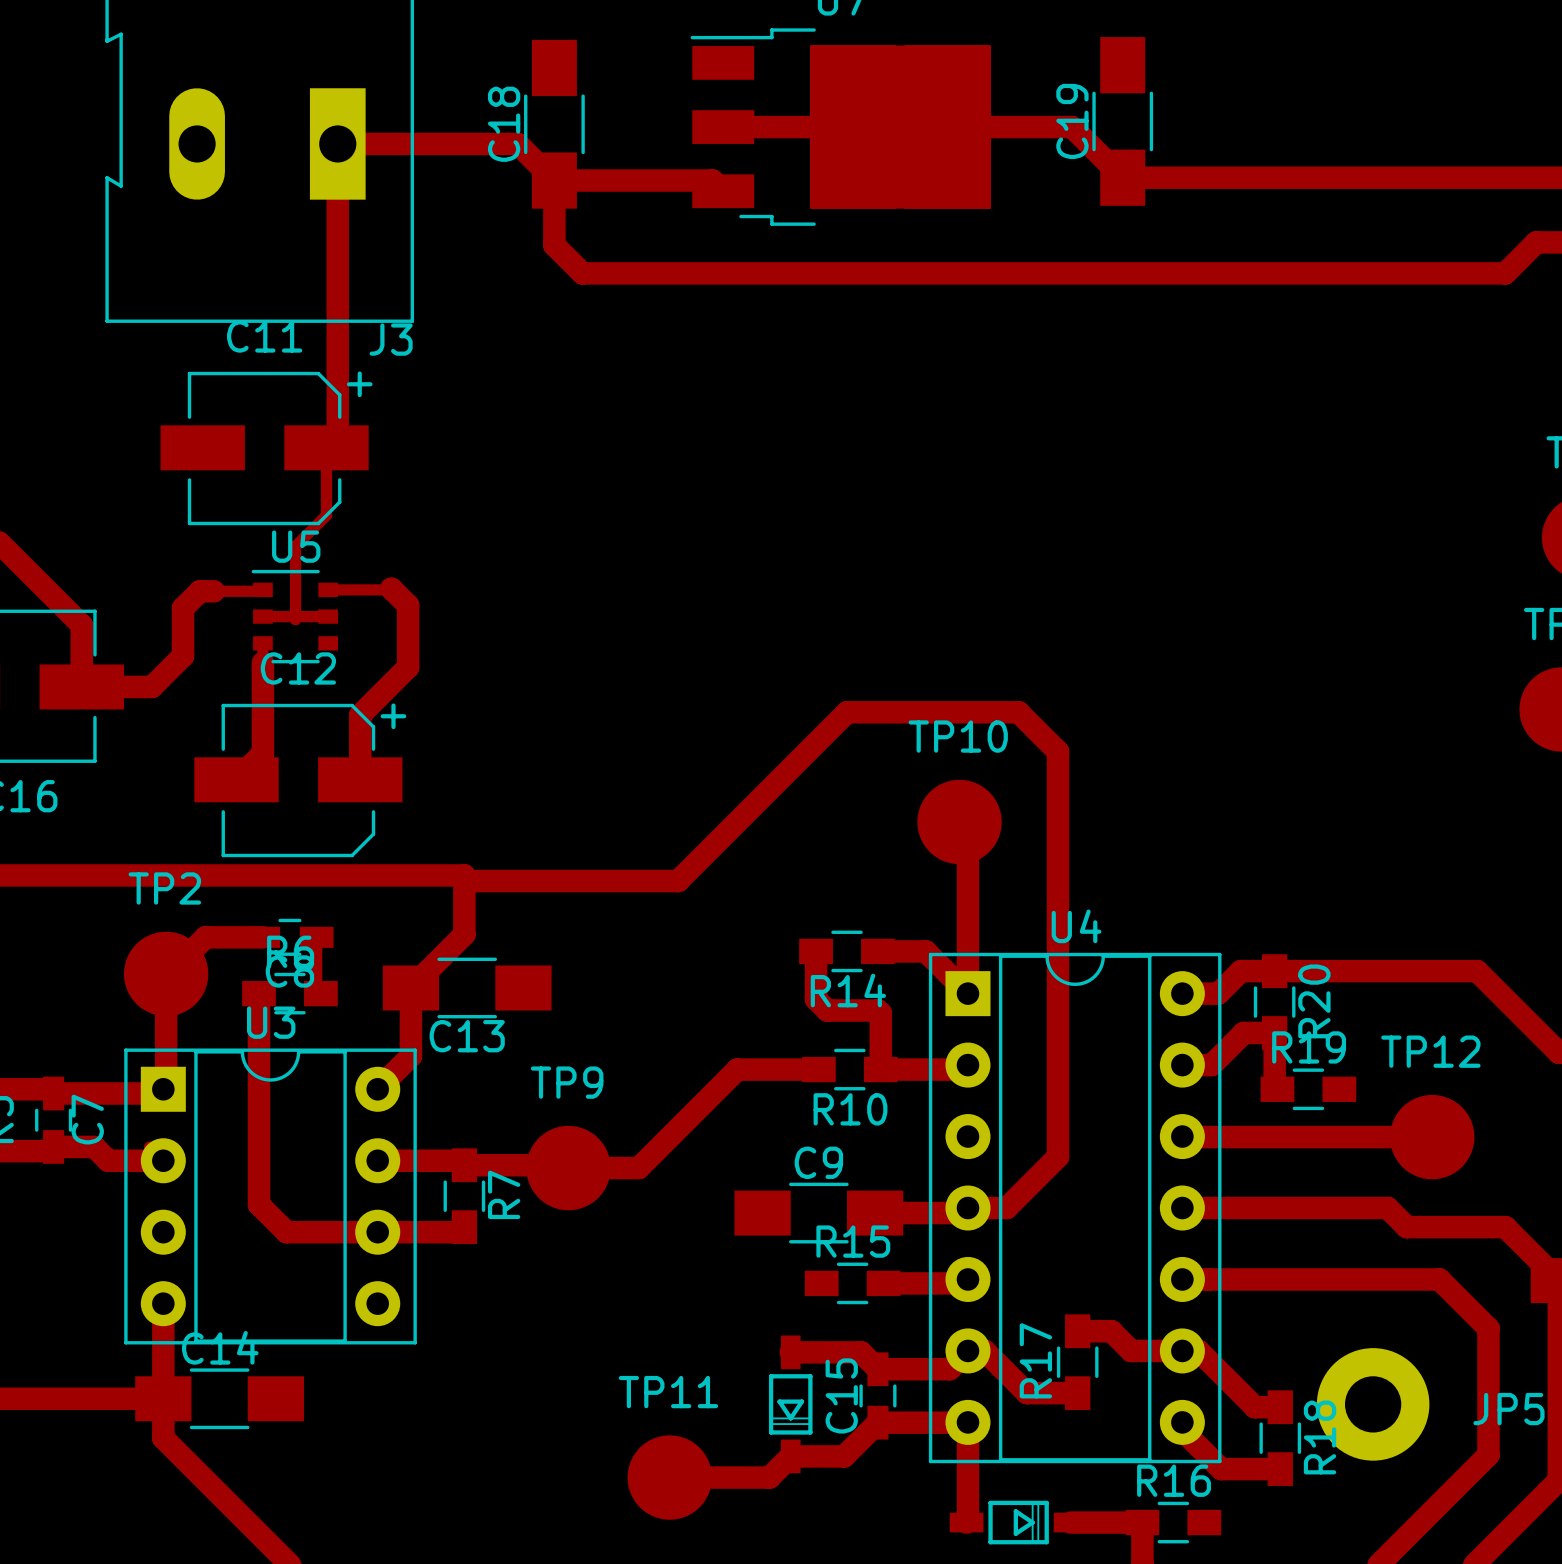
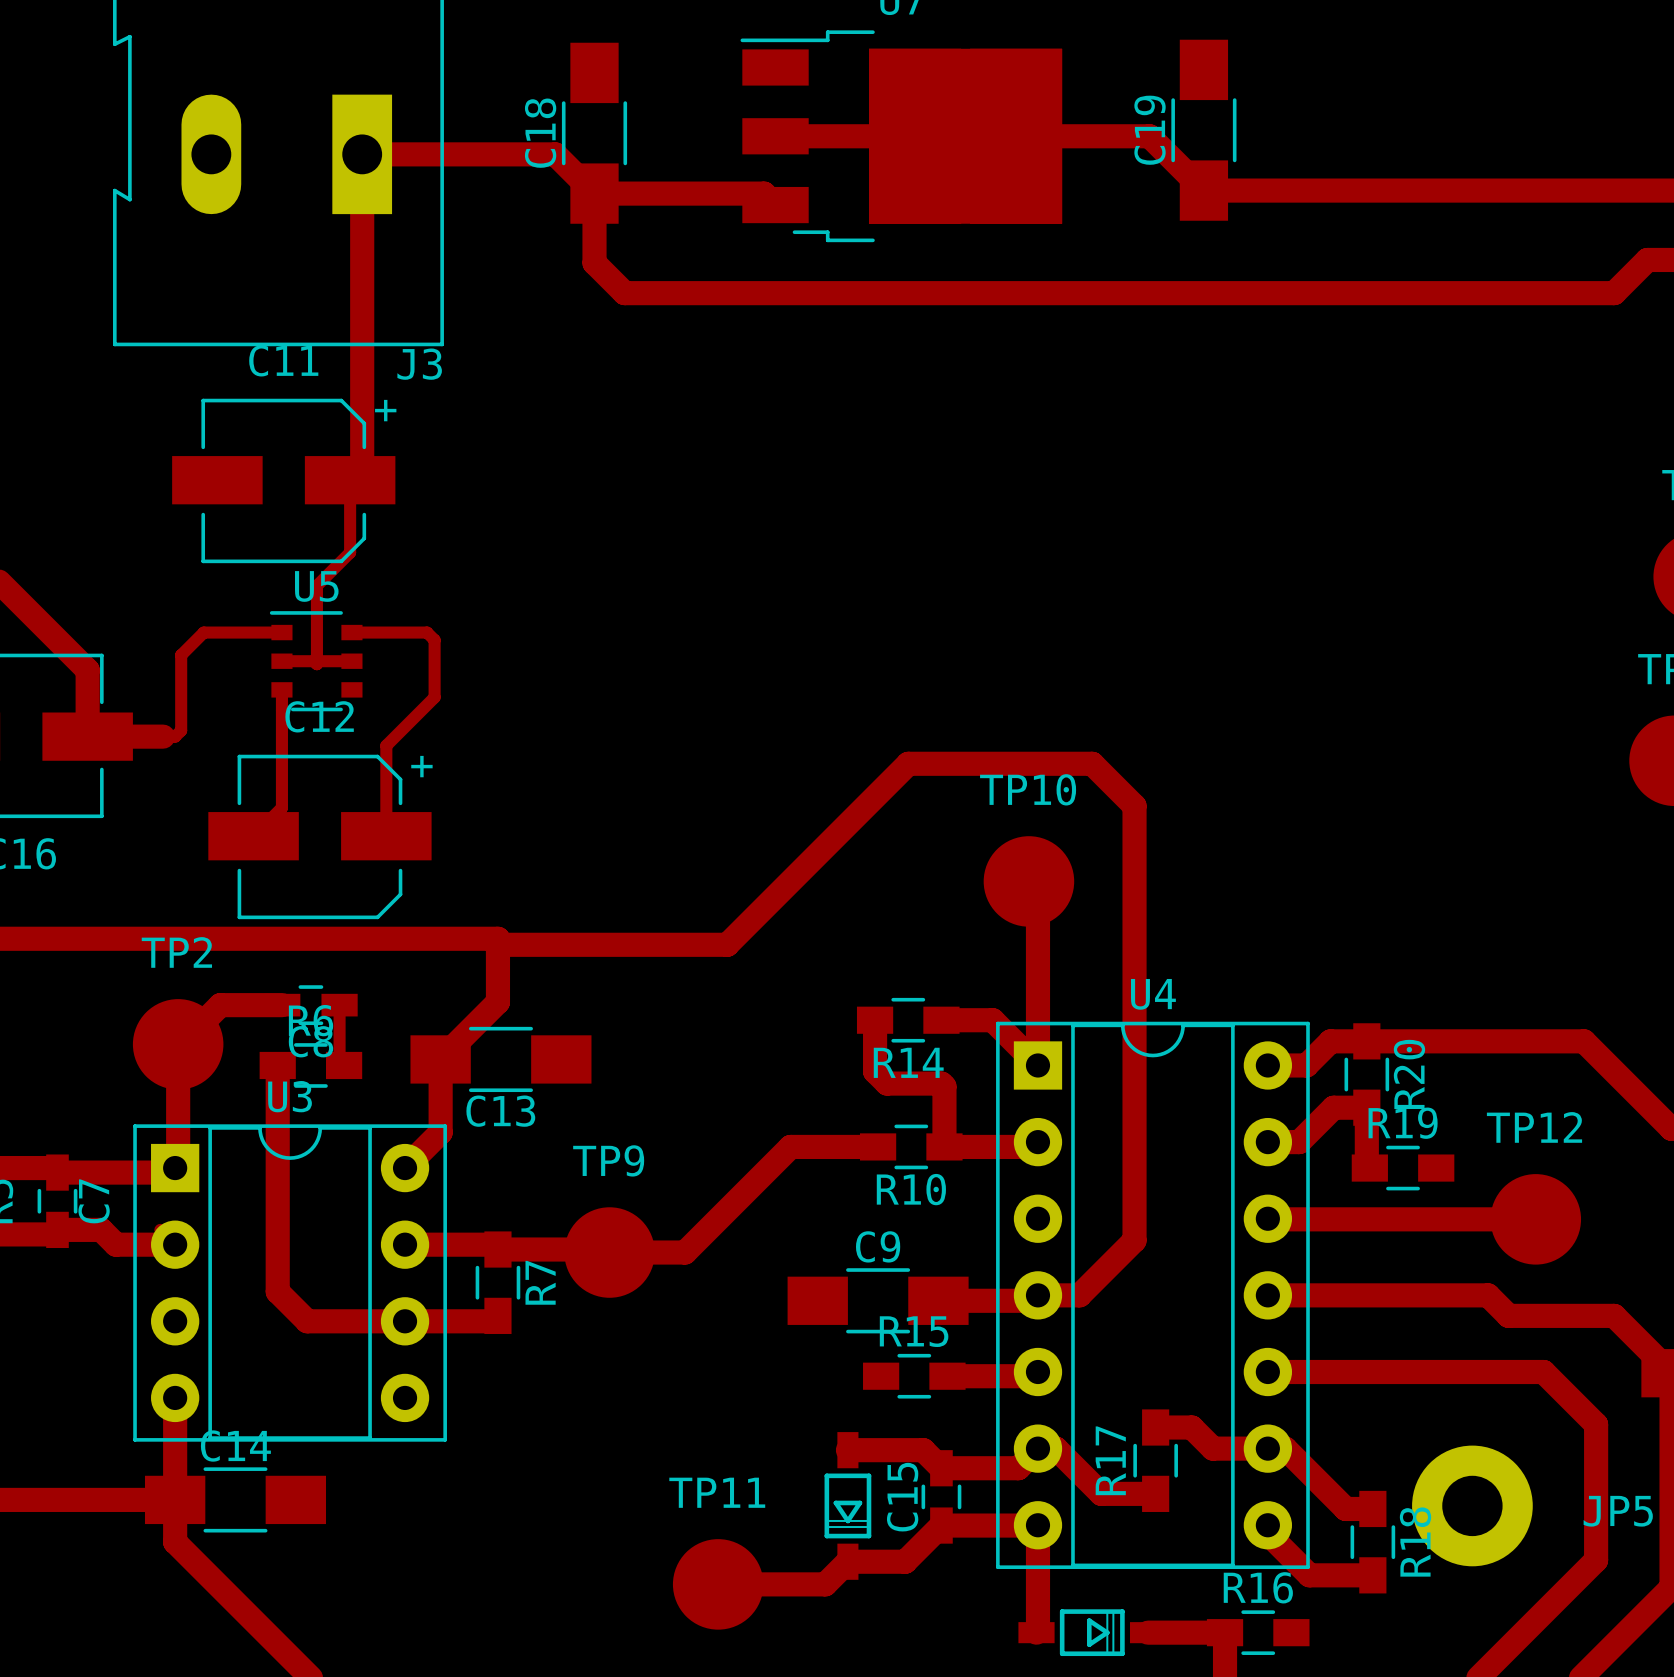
top track: (391, 588) (408, 605) (408, 667) (360, 715) -> (421, 632) (427, 632) (434, 640) (434, 697) (386, 745) (386, 766)
top track: (262, 589) (199, 591) (183, 608) (183, 656) (152, 686) -> (281, 632) (203, 632) (181, 655) (181, 730) (175, 736) (163, 736)
top track width: thick (262, 662) (262, 753) (236, 779) -> thin (281, 710) (281, 807) (253, 836)
top track width: thick (360, 715) (360, 779) -> thin (386, 766) (386, 836)

